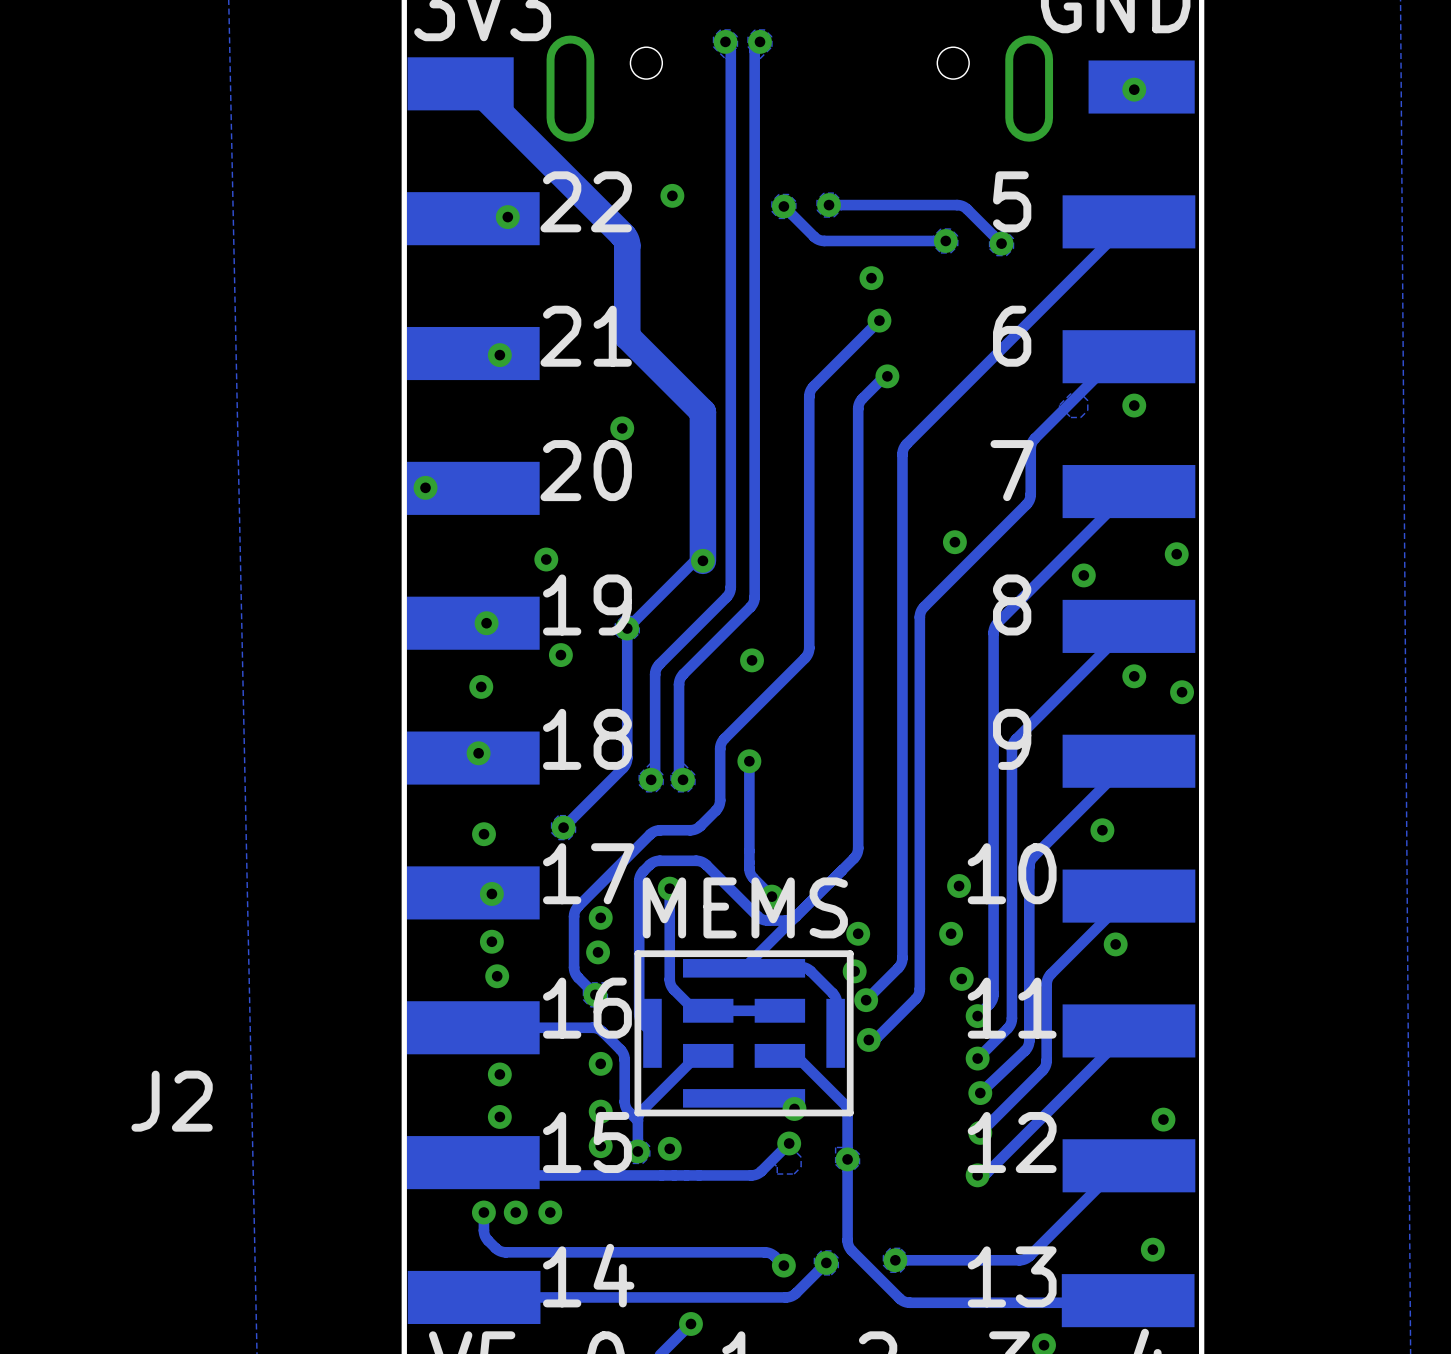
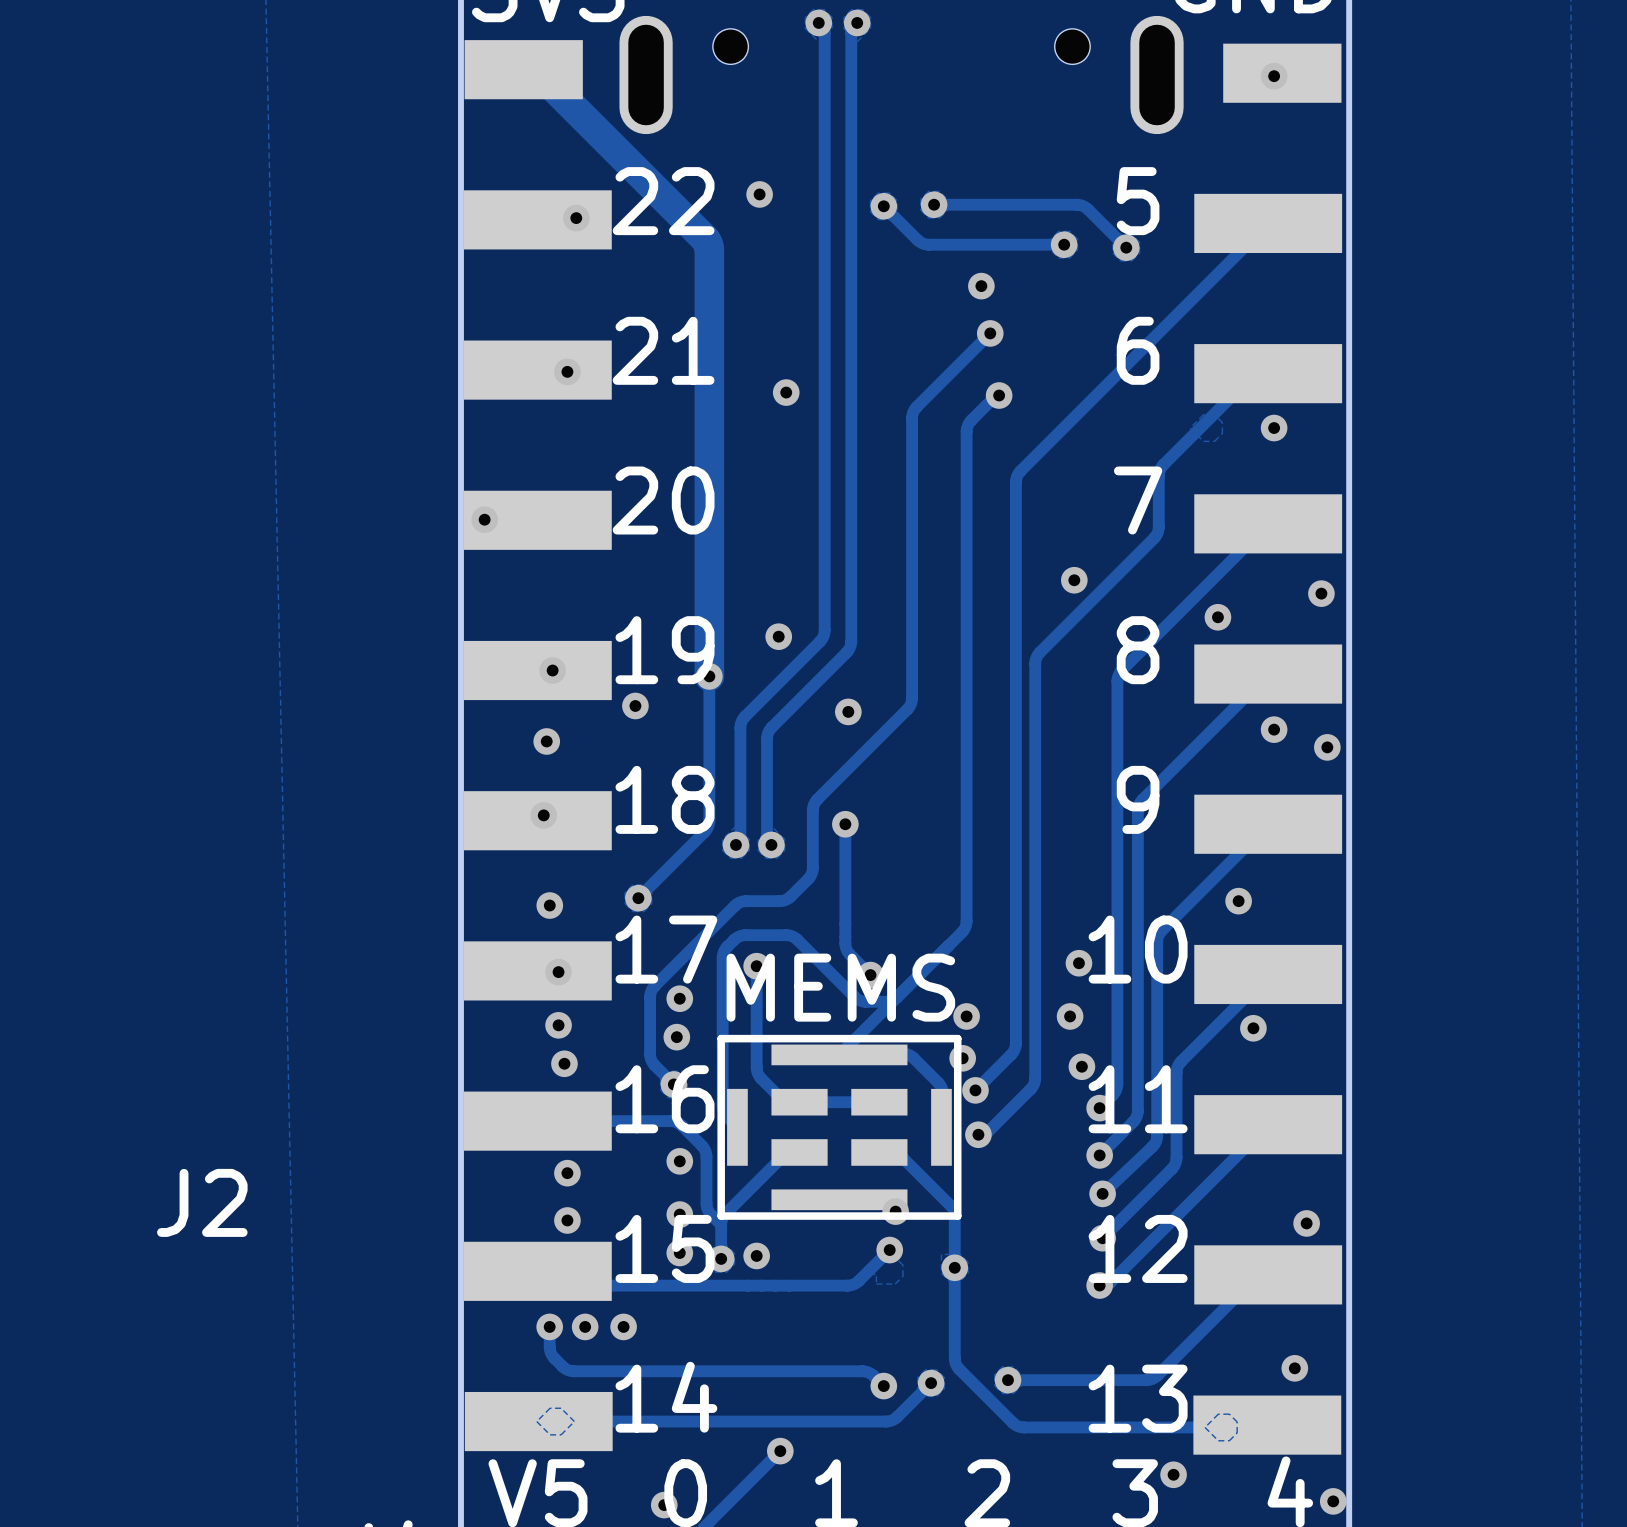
track: (627, 336) (702, 412) (702, 560) (694, 560) (627, 628) -> (709, 351) (709, 676)
via: none -> (786, 392)
via: (622, 428) -> none
via: (546, 559) -> none
via position: (702, 560) -> (778, 636)

